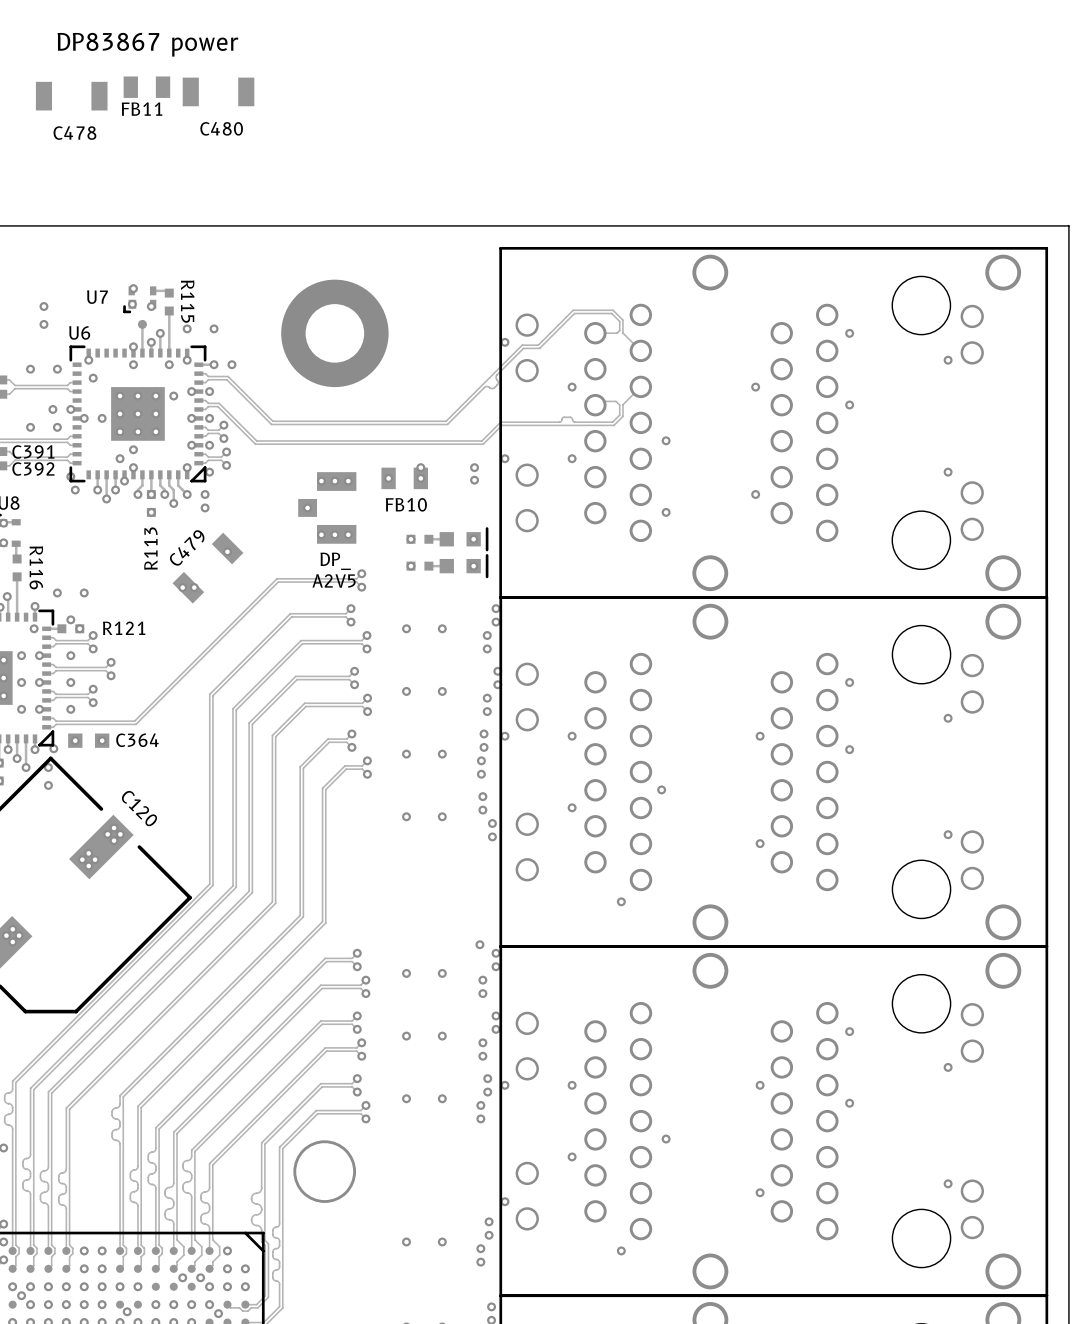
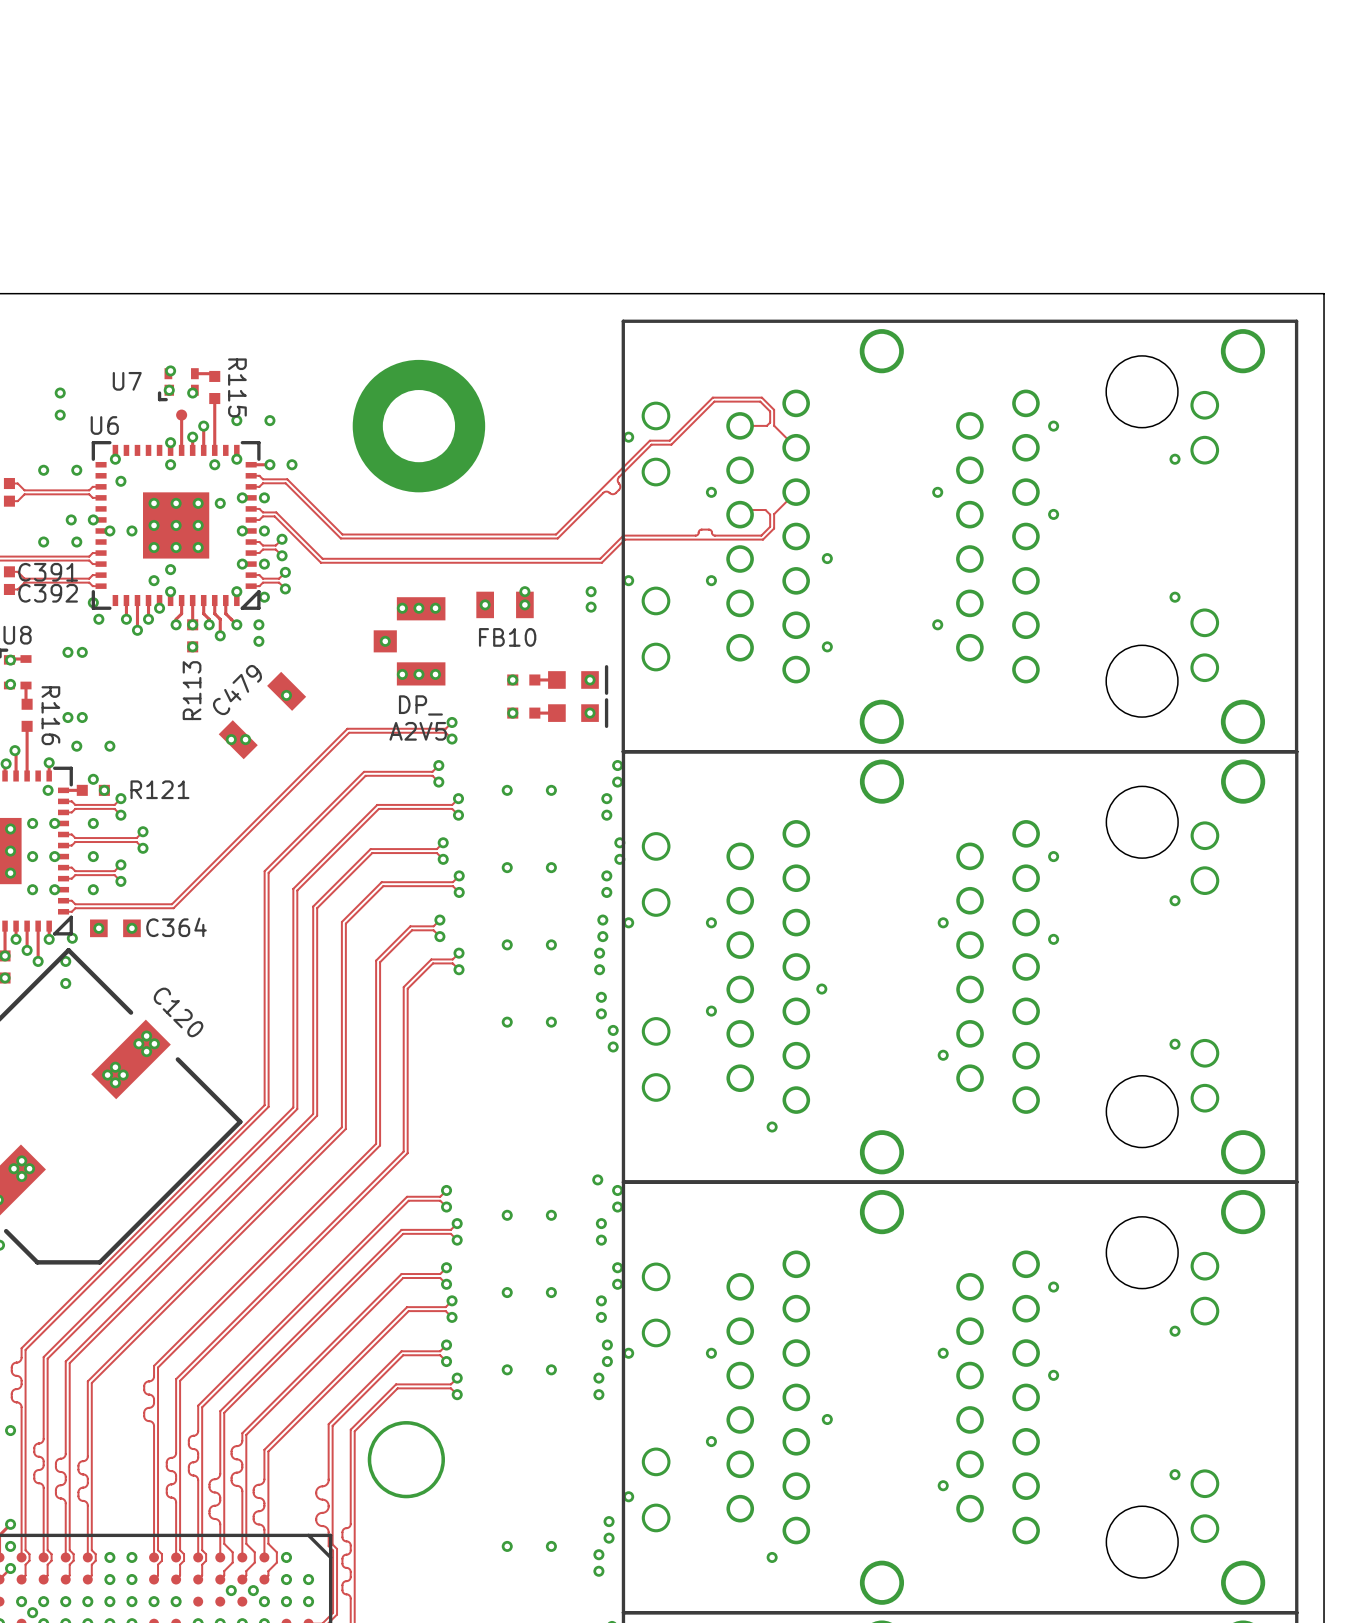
text: DP83867 power (147, 44) -> none
FB11: (146, 87) -> none
C480: (218, 91) -> none
C478: (71, 96) -> none
via: none -> (67, 652)
via: none -> (82, 652)
via: none -> (67, 717)
via: none -> (82, 717)

